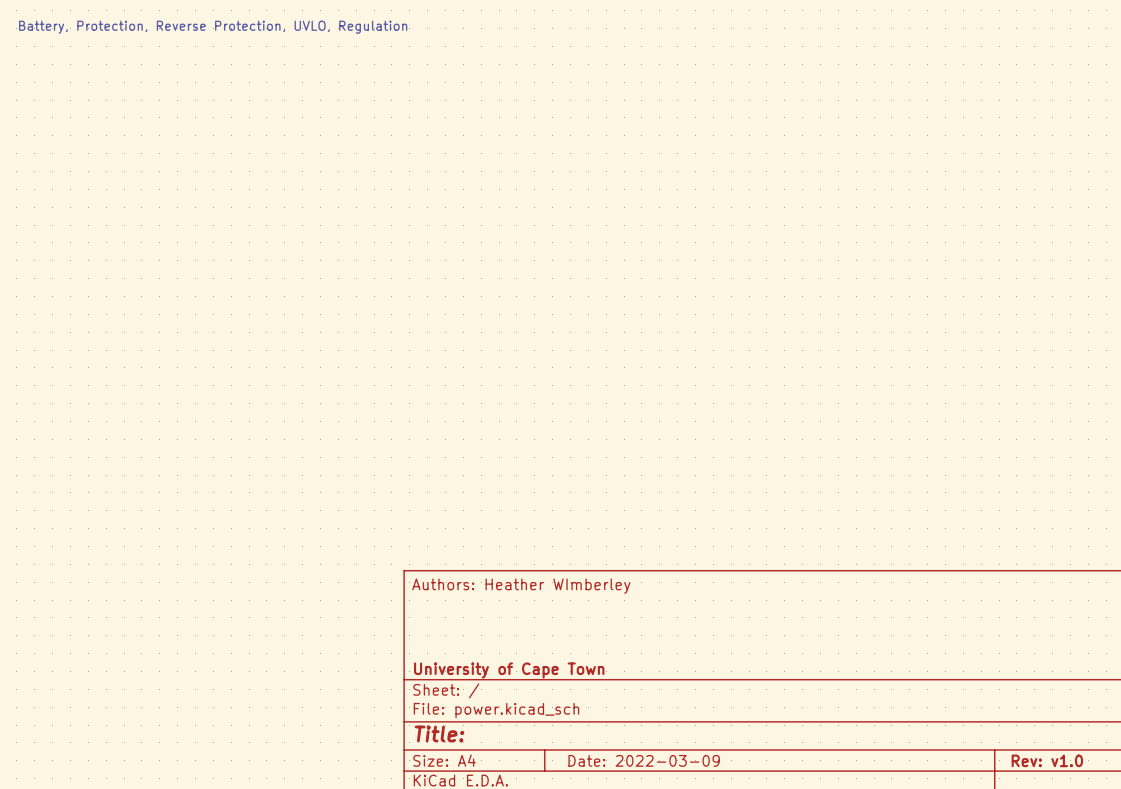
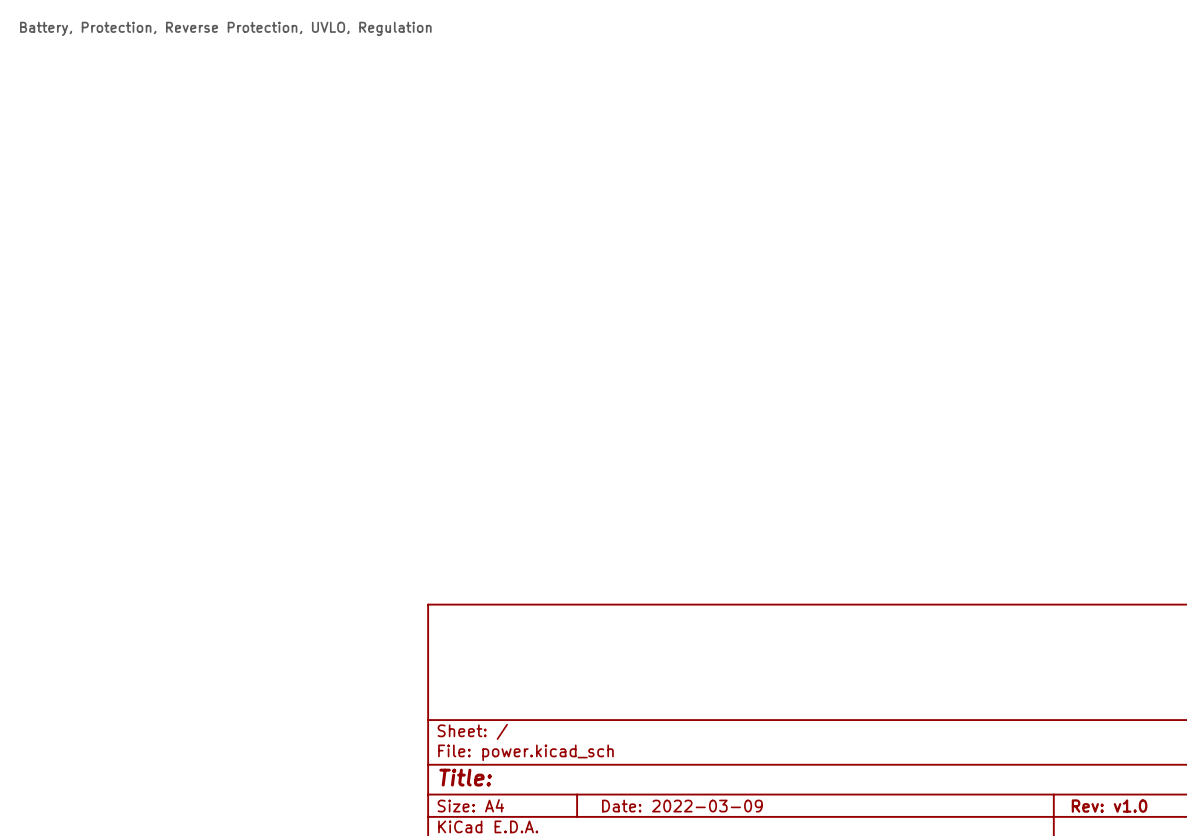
title block: Authors: Heather WImberley (521, 586) -> none
title block: University of Cape Town (509, 670) -> none

